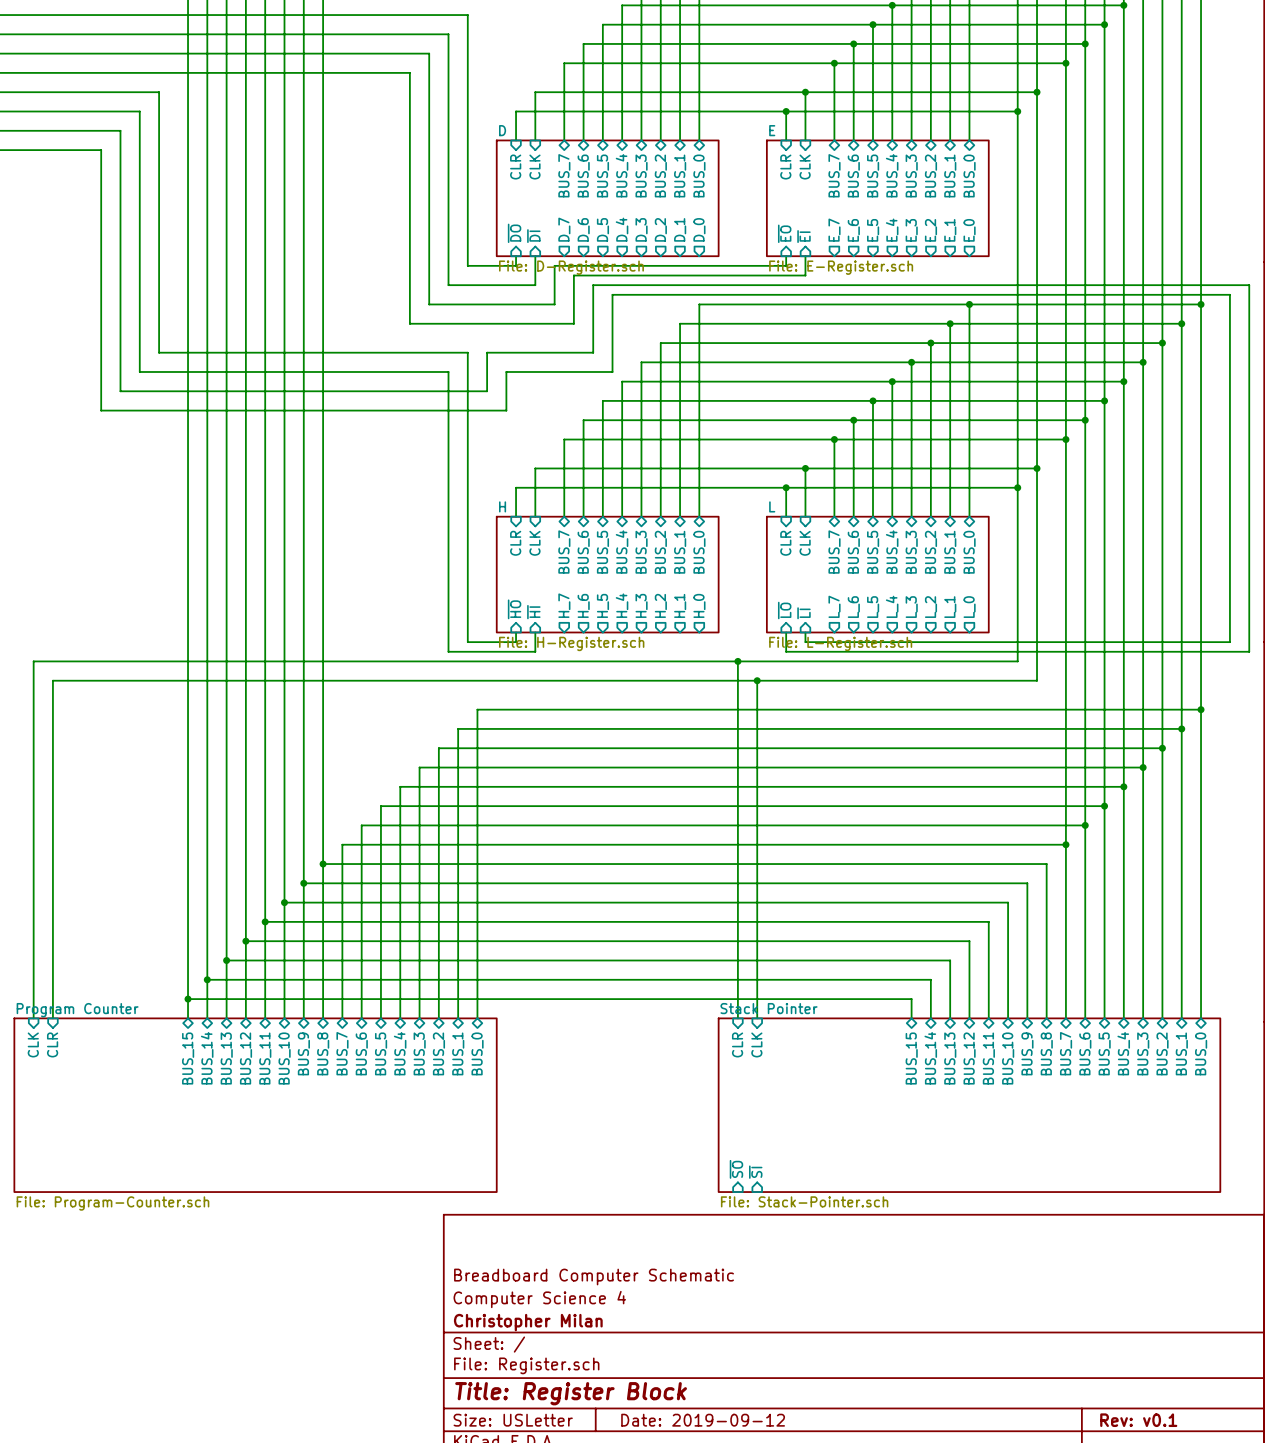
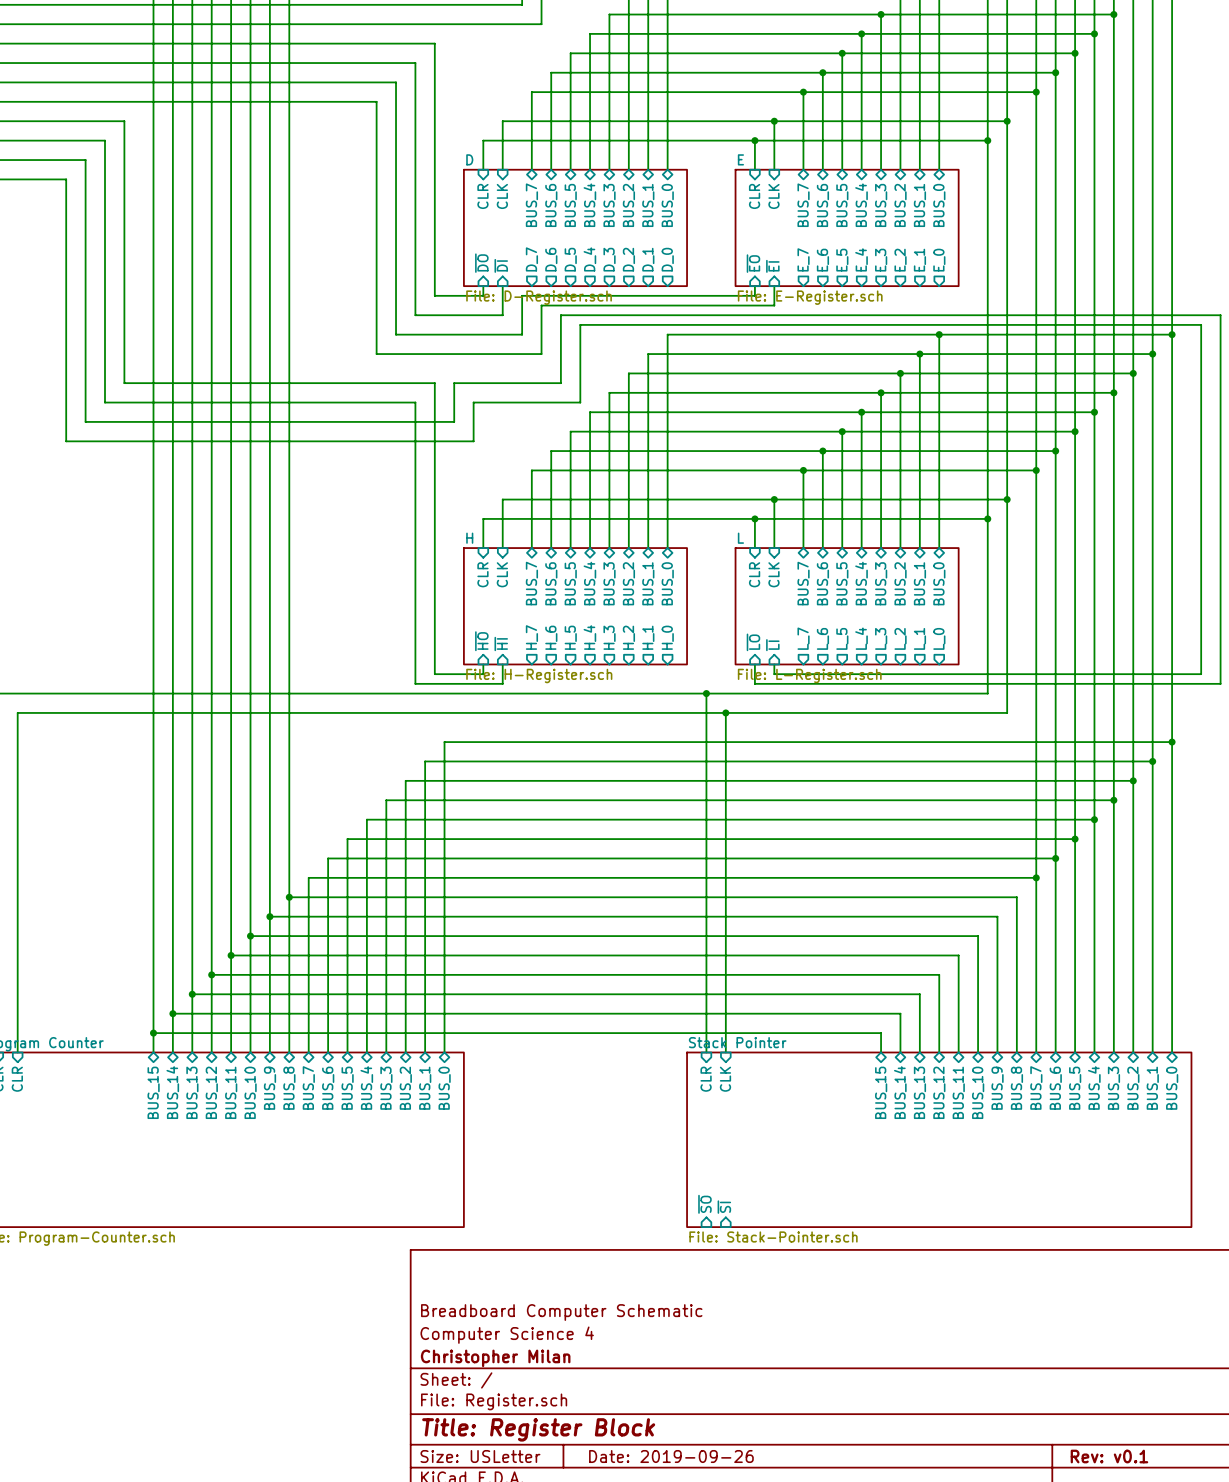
title block: Date: 2019-09-12 (703, 1420) -> Date: 2019-09-26 (671, 1456)

